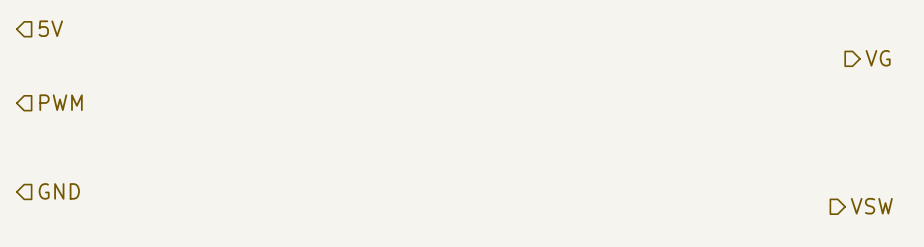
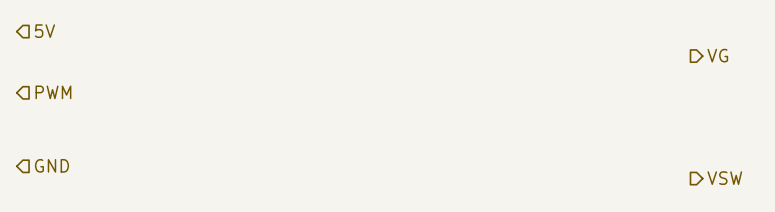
hierarchical label position: VG (878, 58) -> VG (717, 55)

